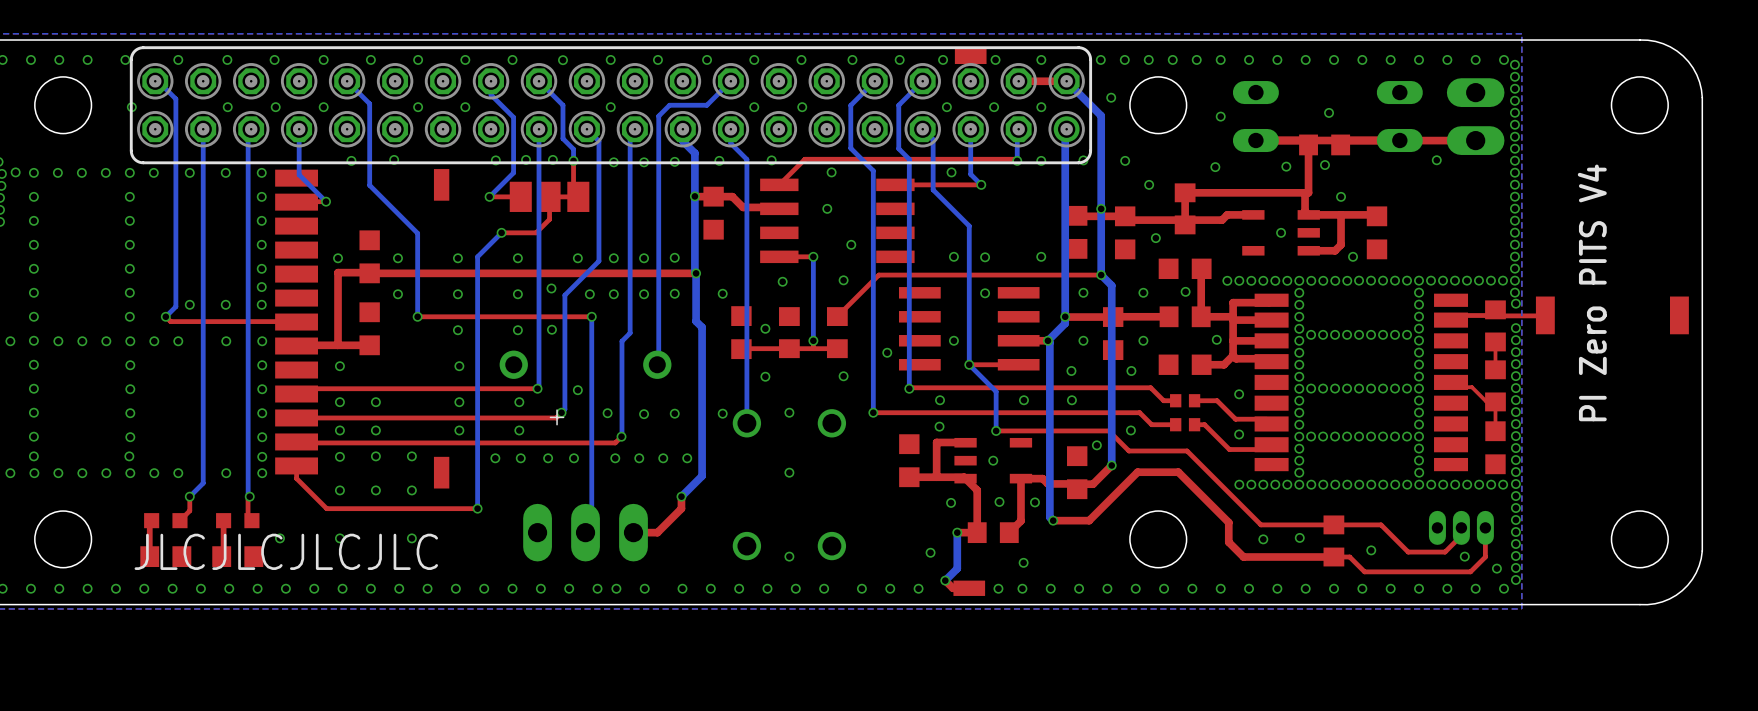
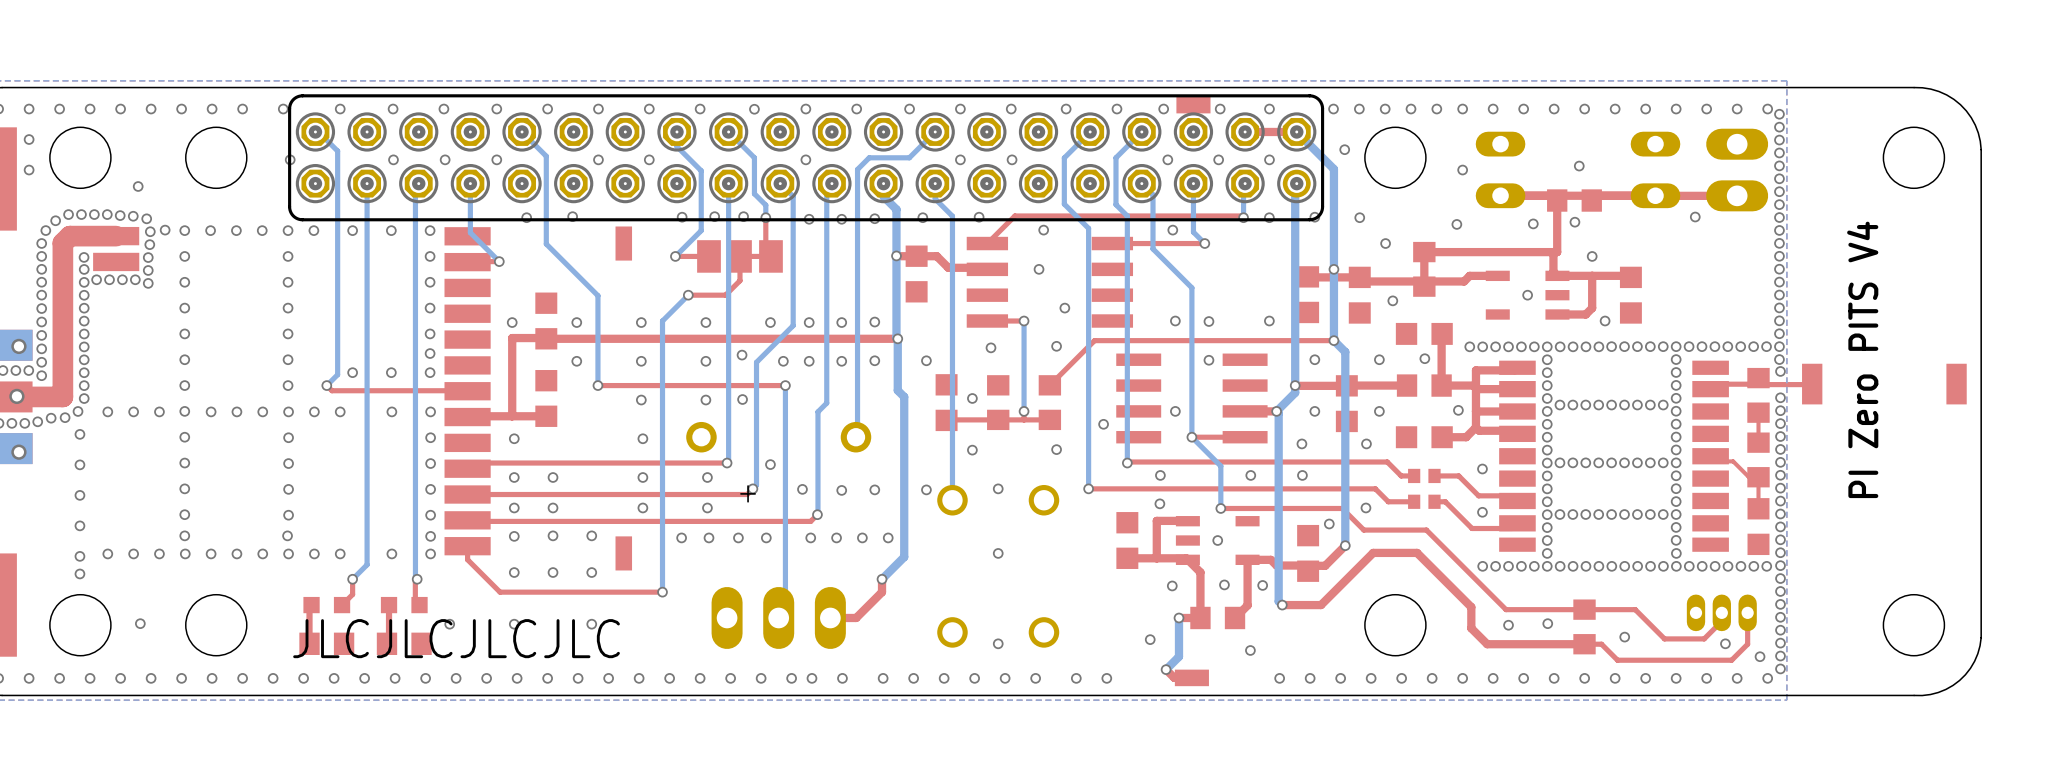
via: (918, 588) -> none
via: (998, 588) -> none
via: (1022, 588) -> none

